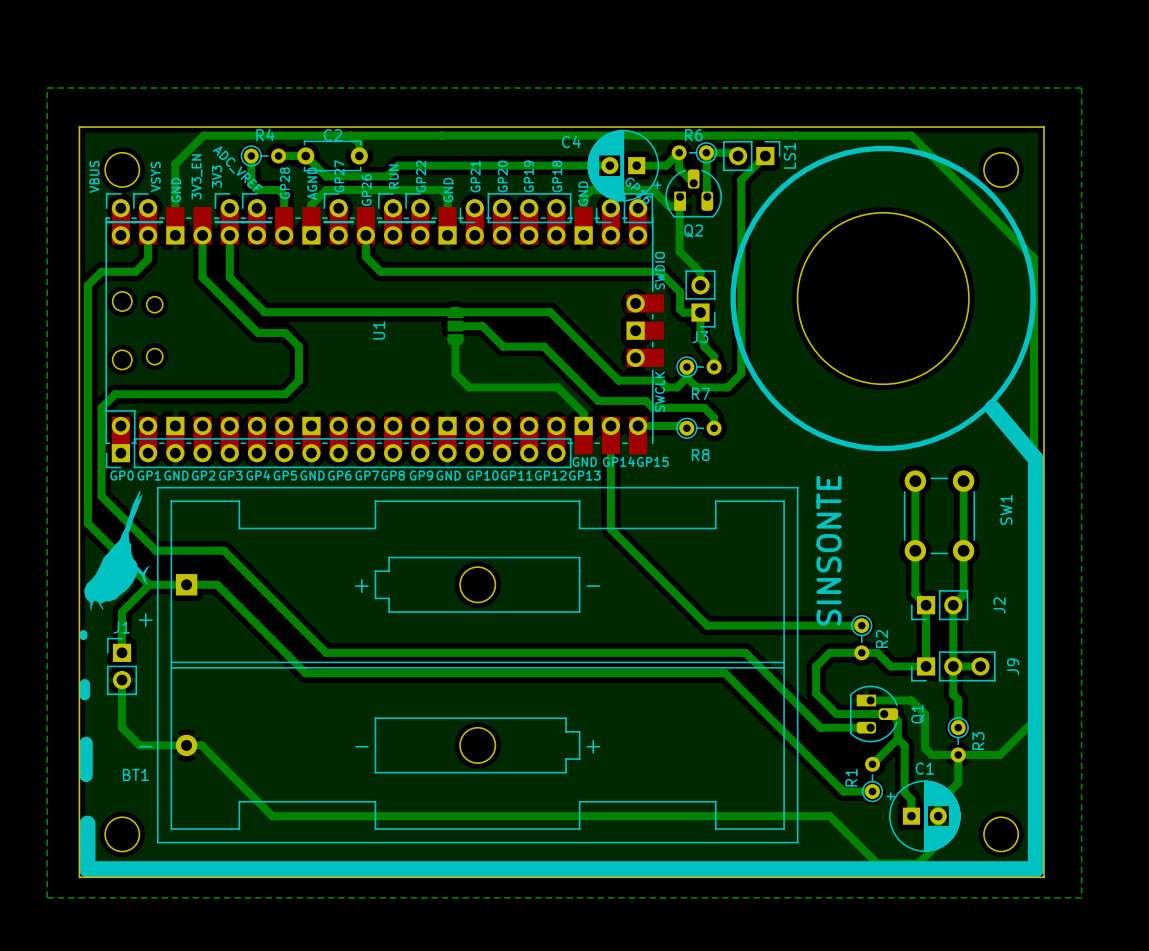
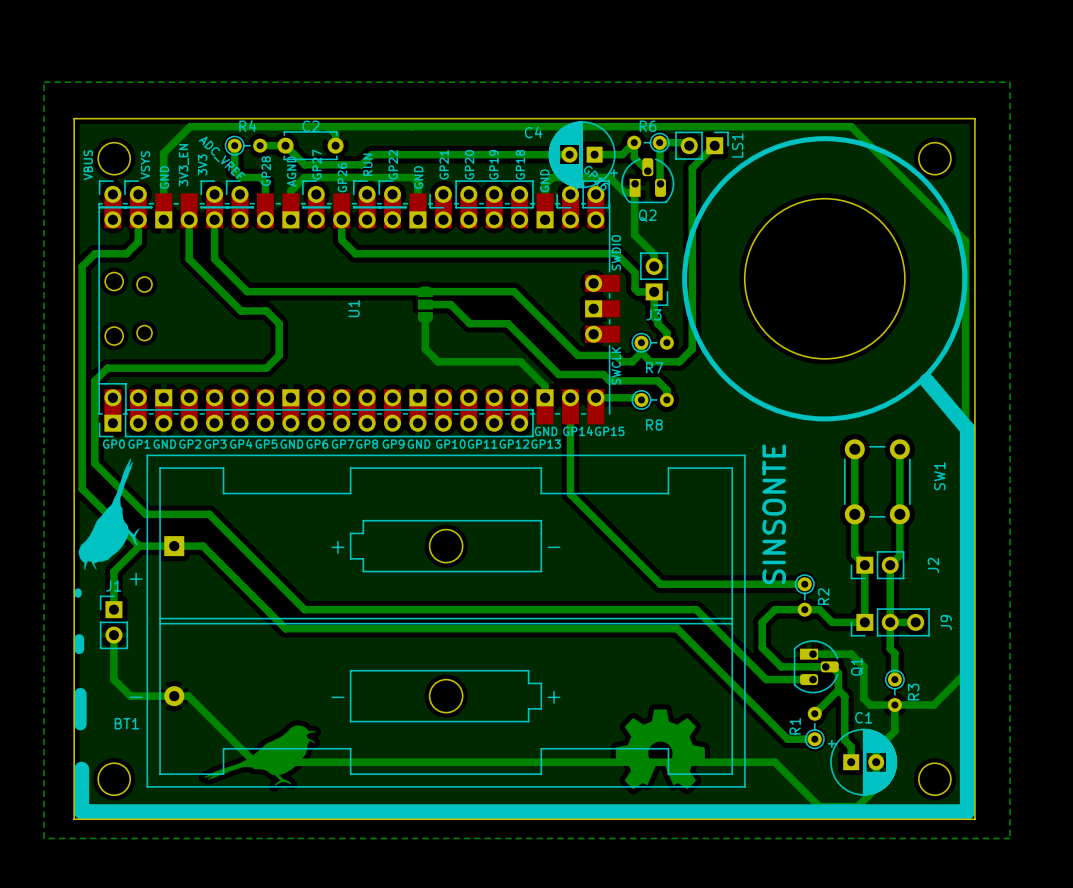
drawing: none -> [615, 709, 705, 790]
drawing: none -> [203, 725, 317, 787]

